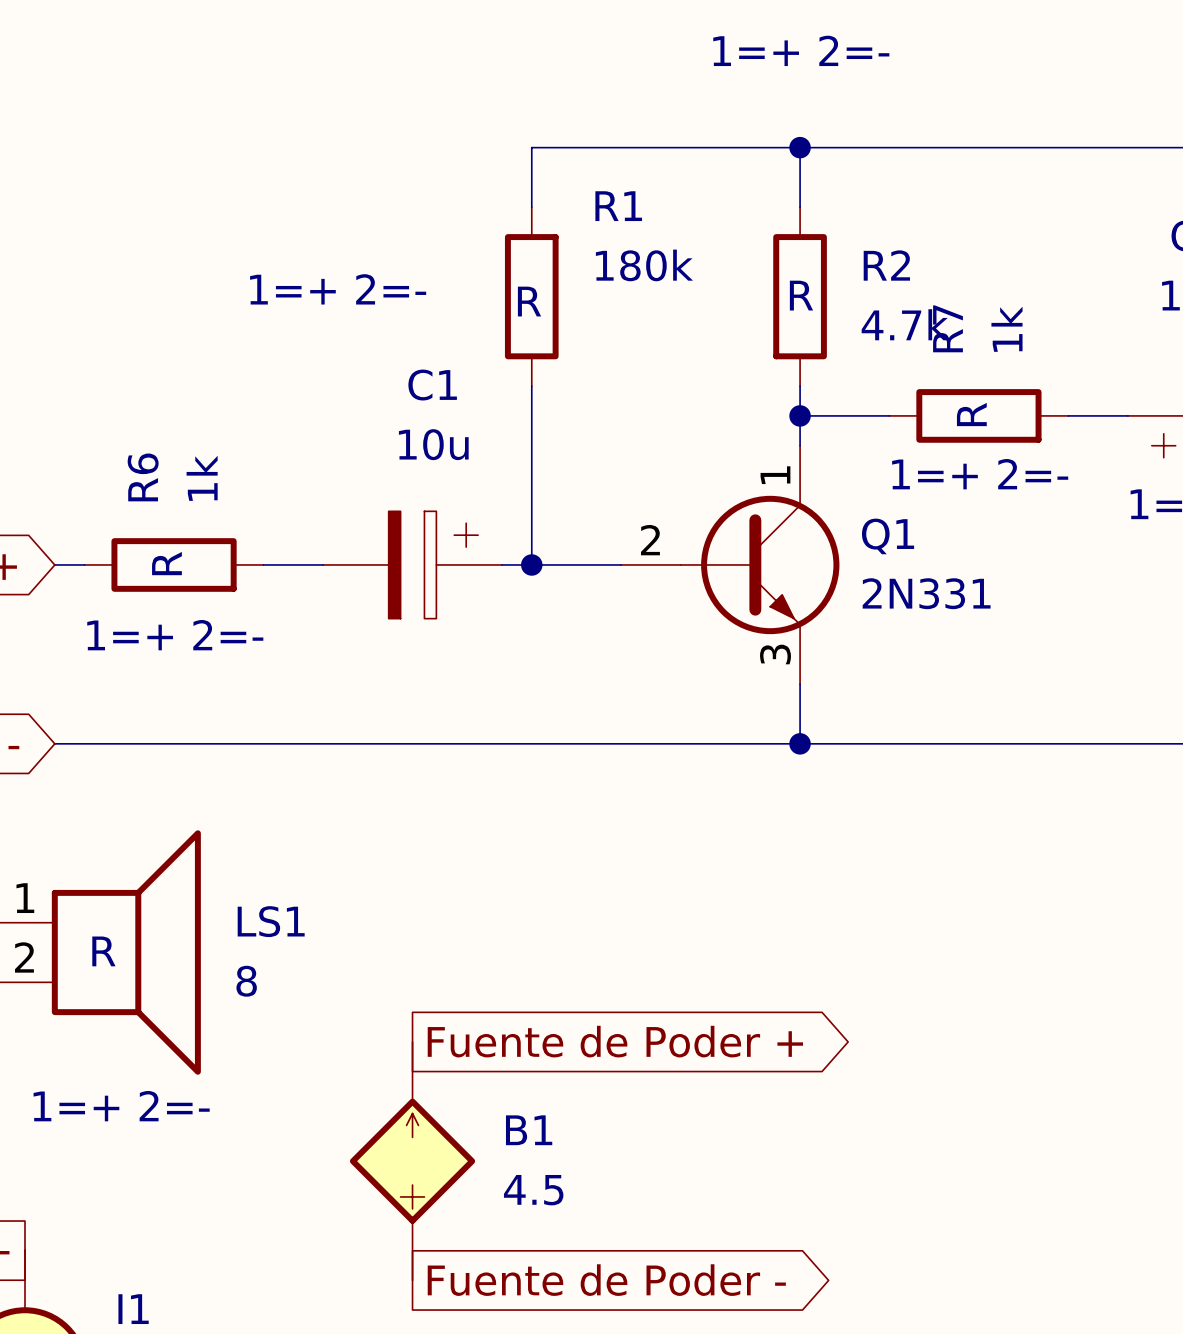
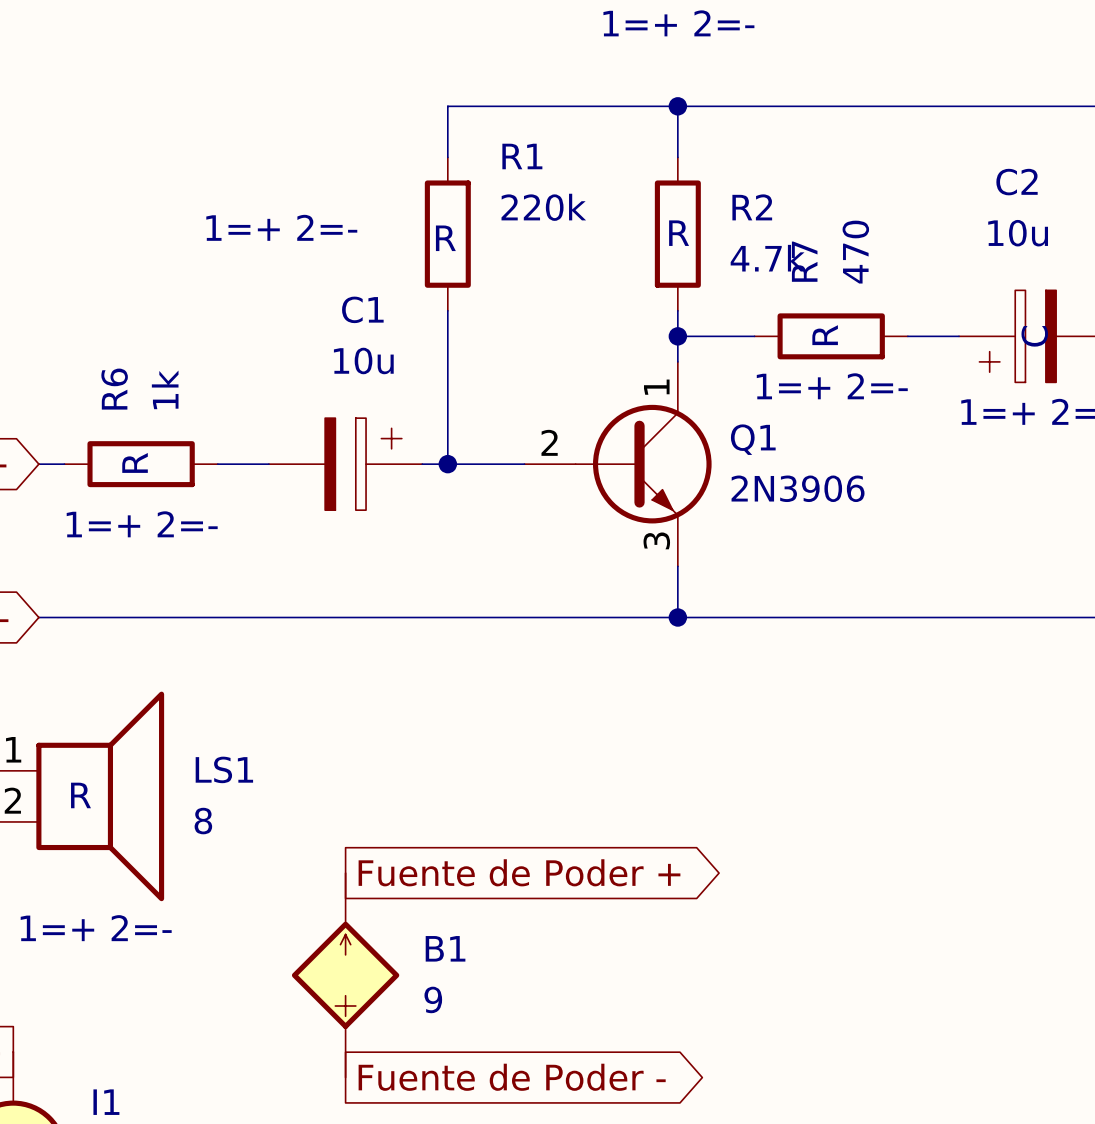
R1 value: 180k (644, 265) -> 220k (543, 207)
R7 value: 1k (1006, 329) -> 470 (855, 252)
Q1 value: 2N331 (926, 593) -> 2N3906 (798, 488)
B1 value: 4.5 (533, 1190) -> 9 (433, 999)

